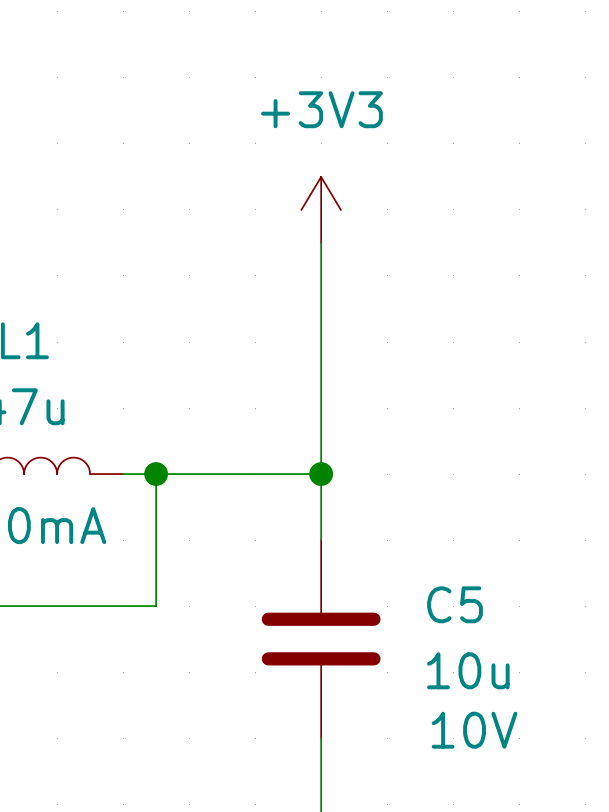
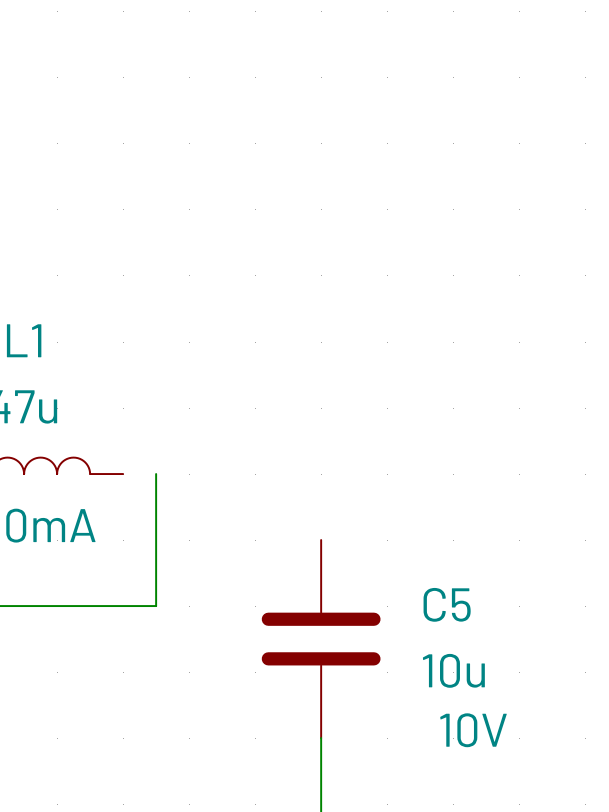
power symbol: +3V3 (321, 209) -> none
wire: (321, 242) (321, 540) -> none
wire: (123, 474) (321, 474) -> none
junction: (156, 474) -> none
junction: (321, 474) -> none

